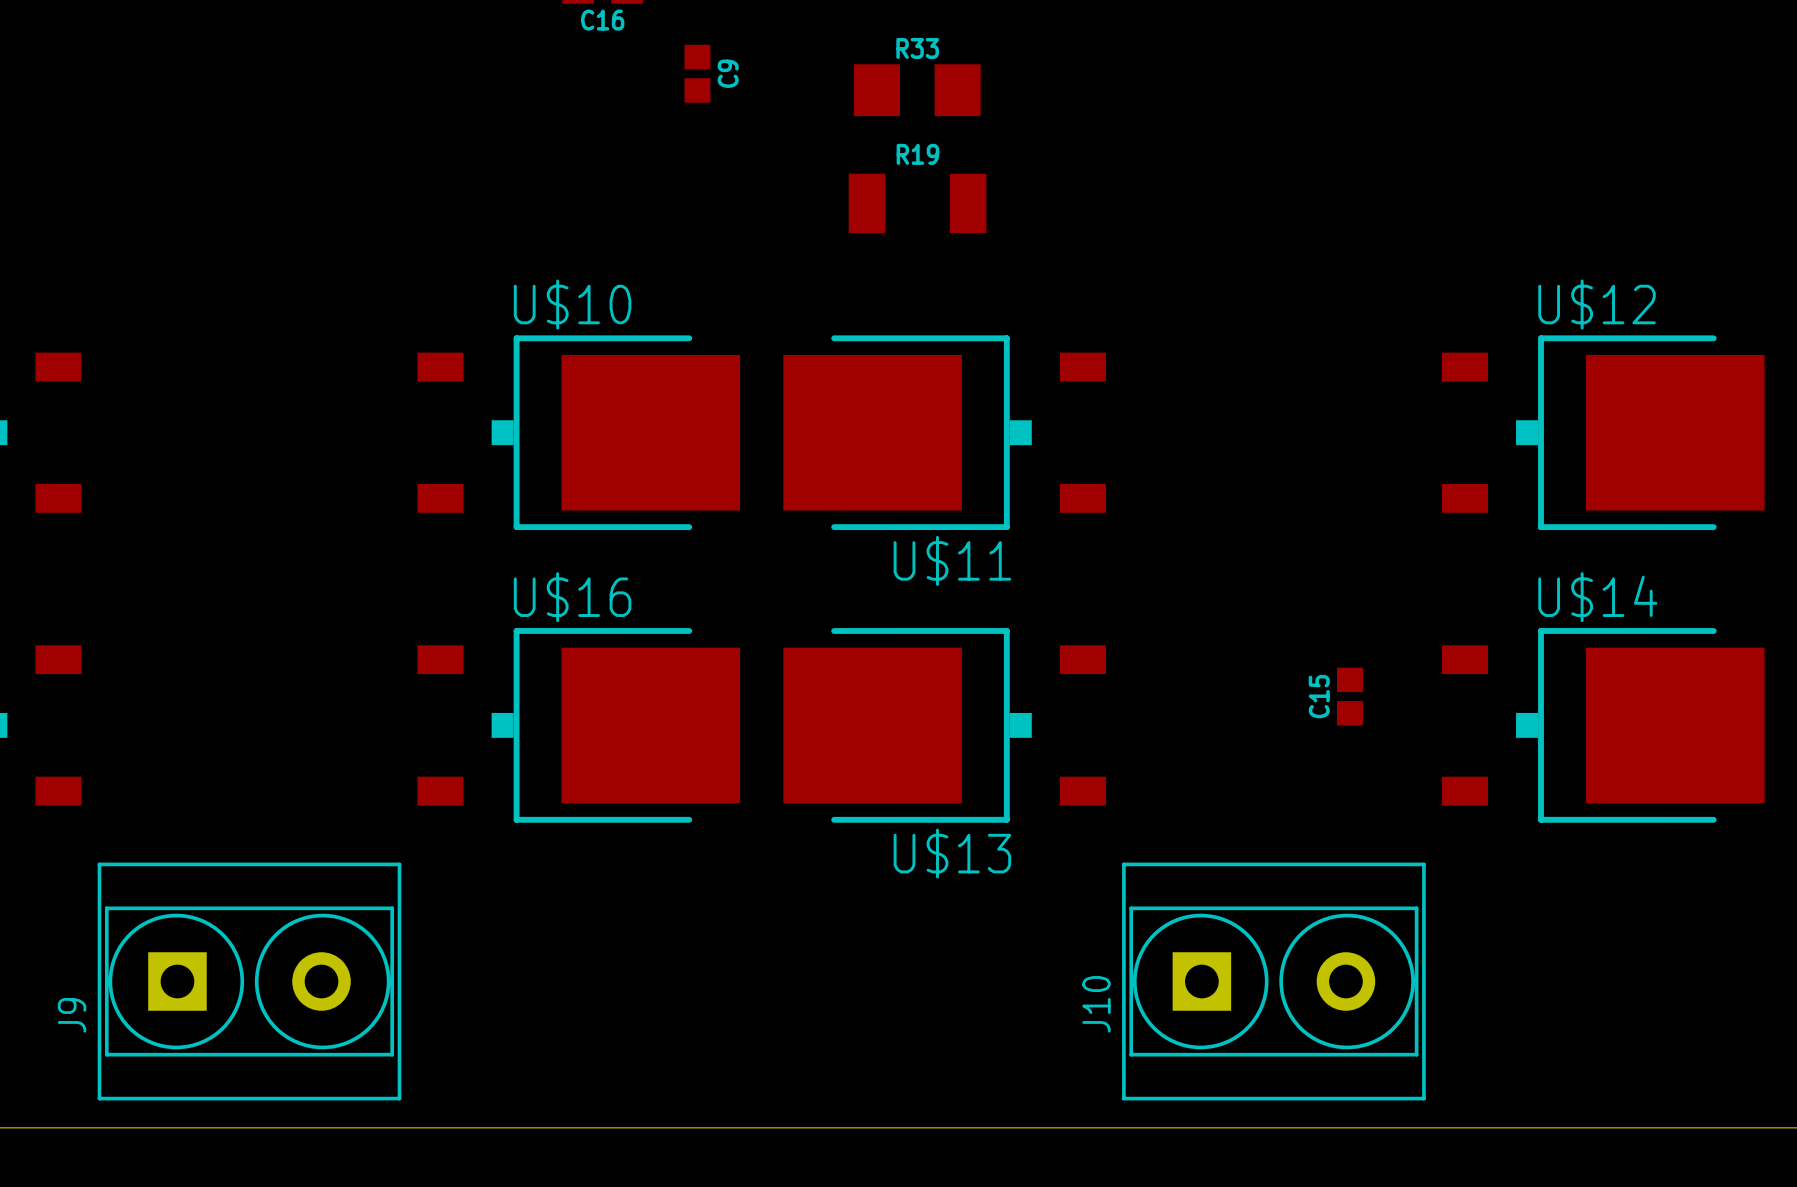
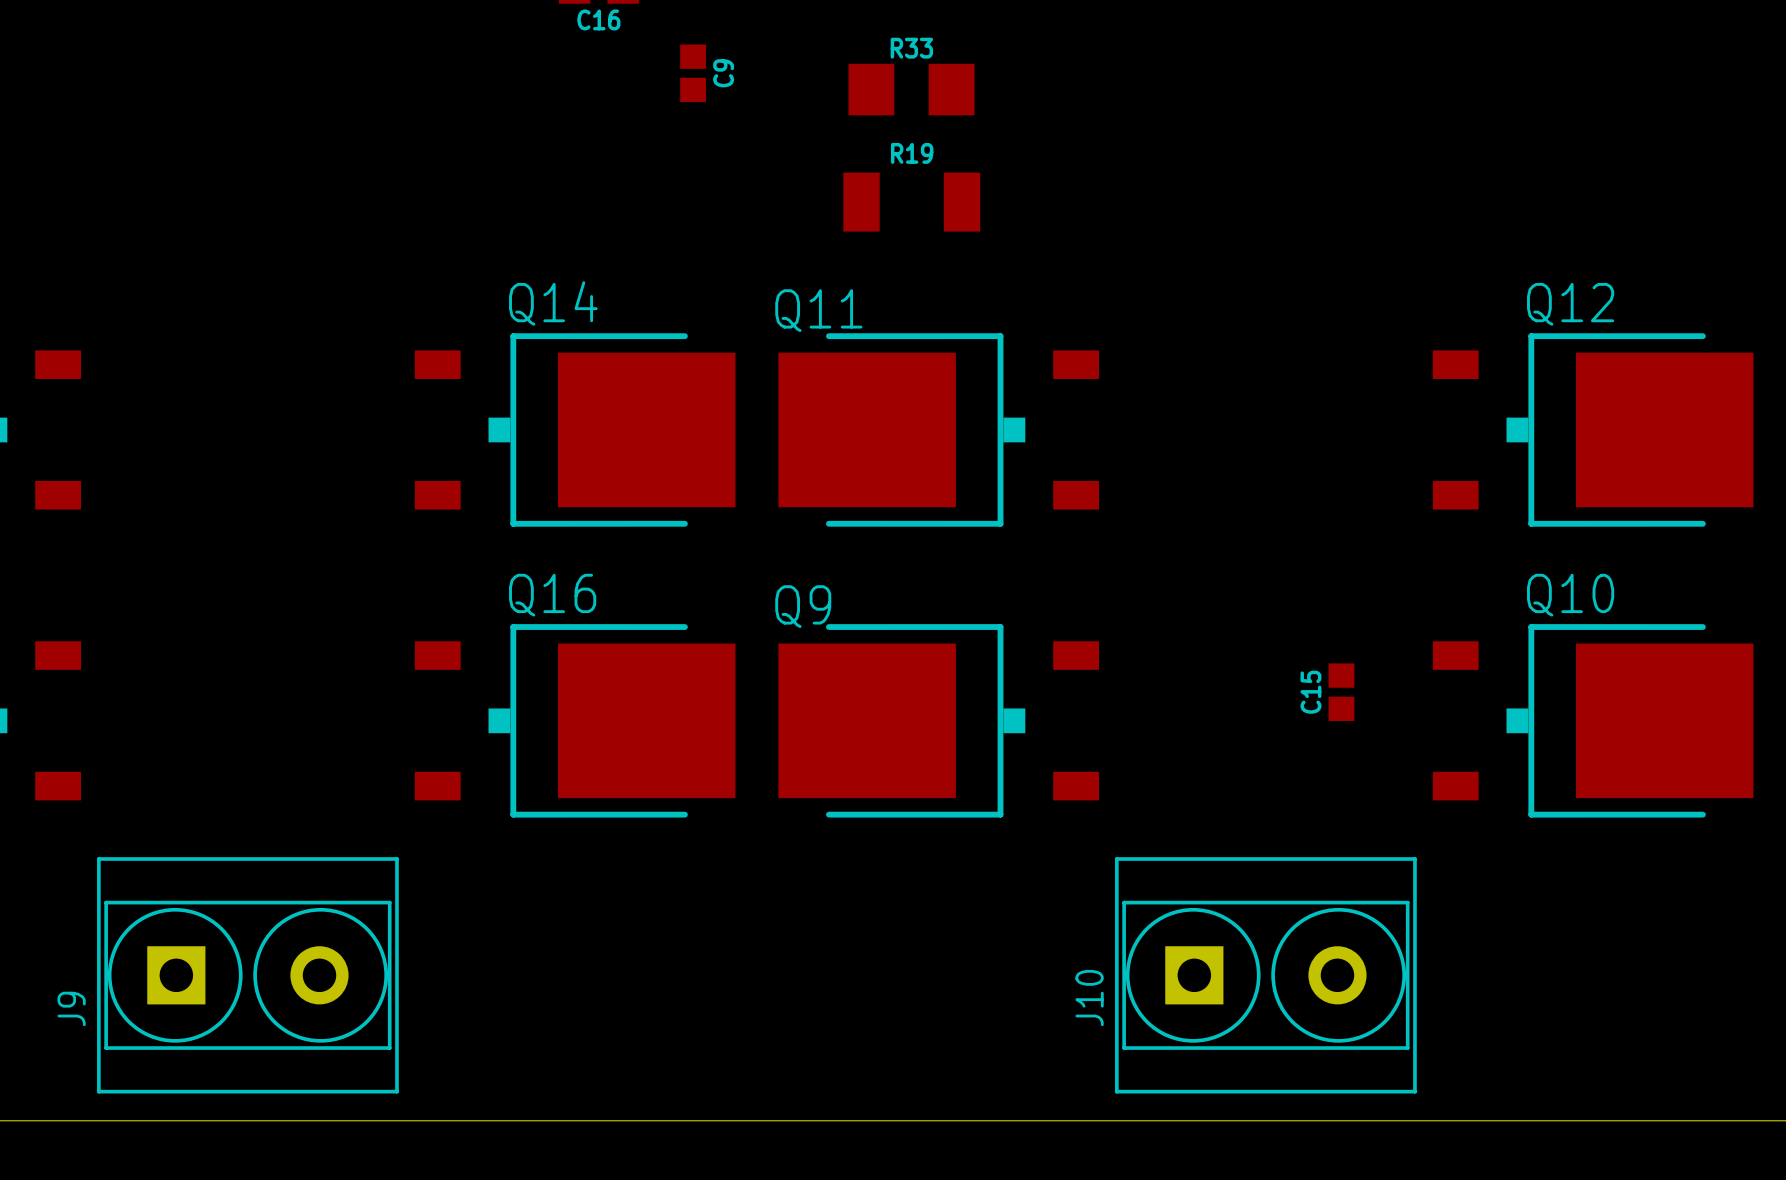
U$10 name: U$10 (572, 304) -> Q14 (553, 303)
U$12 name: U$12 (1597, 304) -> Q12 (1570, 304)
U$11 name: U$11 (952, 560) -> Q11 (818, 310)
U$16 name: U$16 (572, 597) -> Q16 (552, 595)
U$14 name: U$14 (1597, 597) -> Q10 (1570, 595)
U$13 name: U$13 (952, 853) -> Q9 (803, 606)

